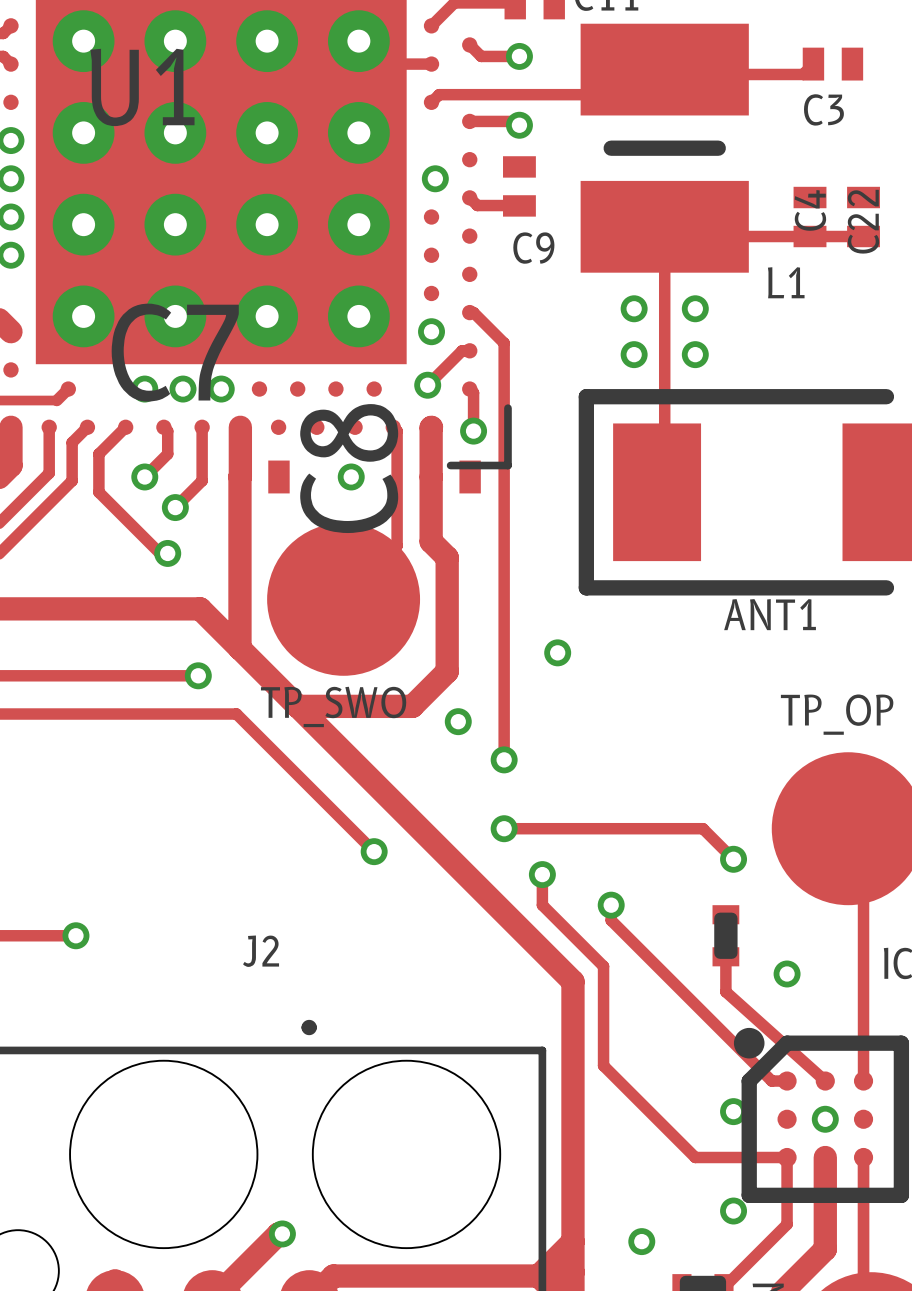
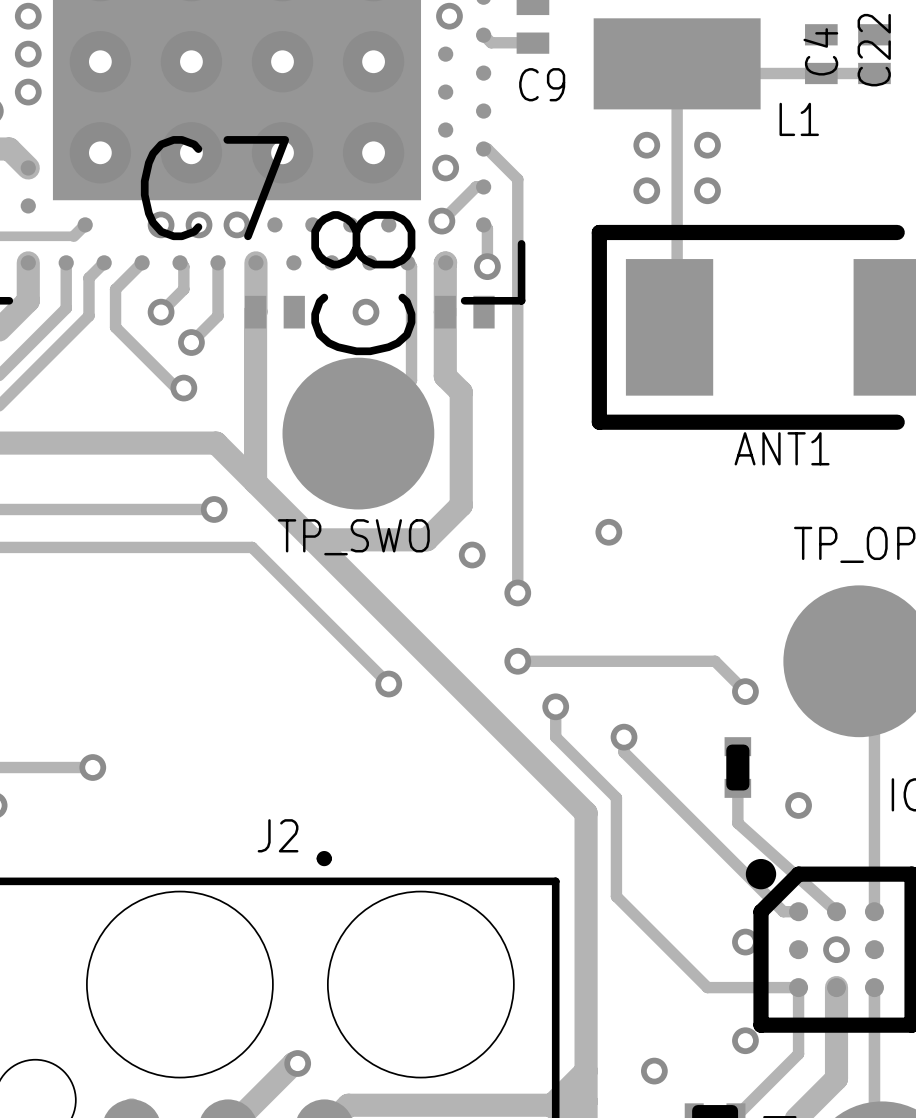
via position: (557, 652) -> (608, 532)
J2 name position: J2 (261, 951) -> J2 (278, 835)

